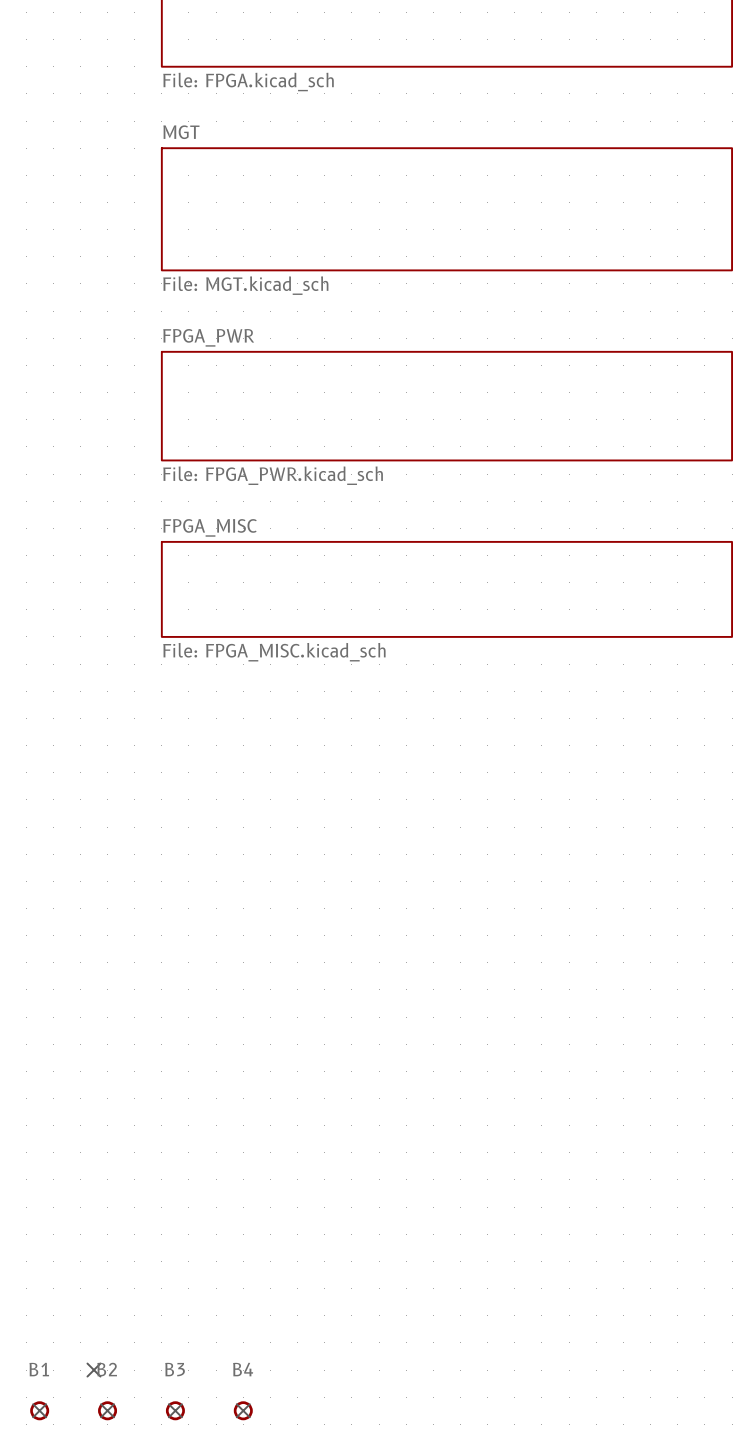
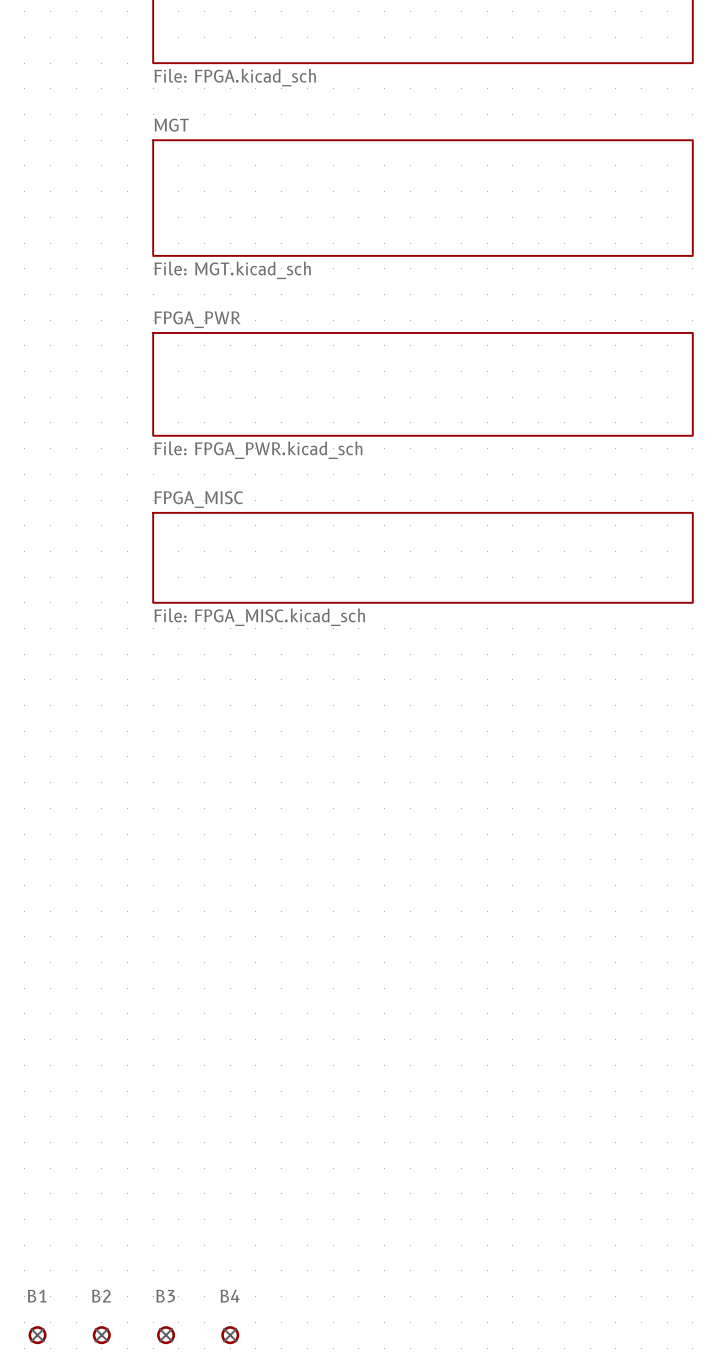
no-connect mark: (93, 1370) -> none

